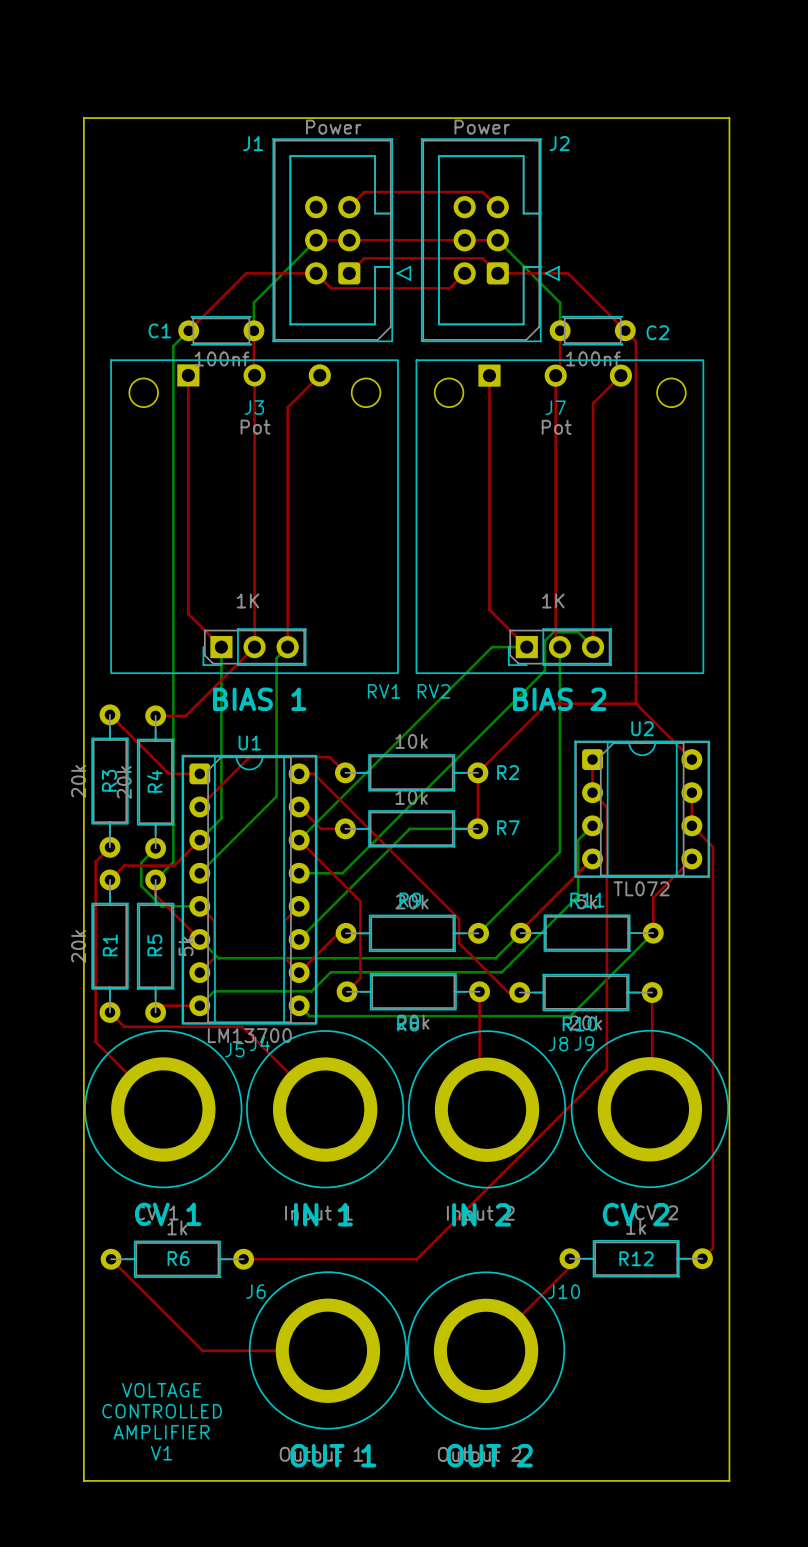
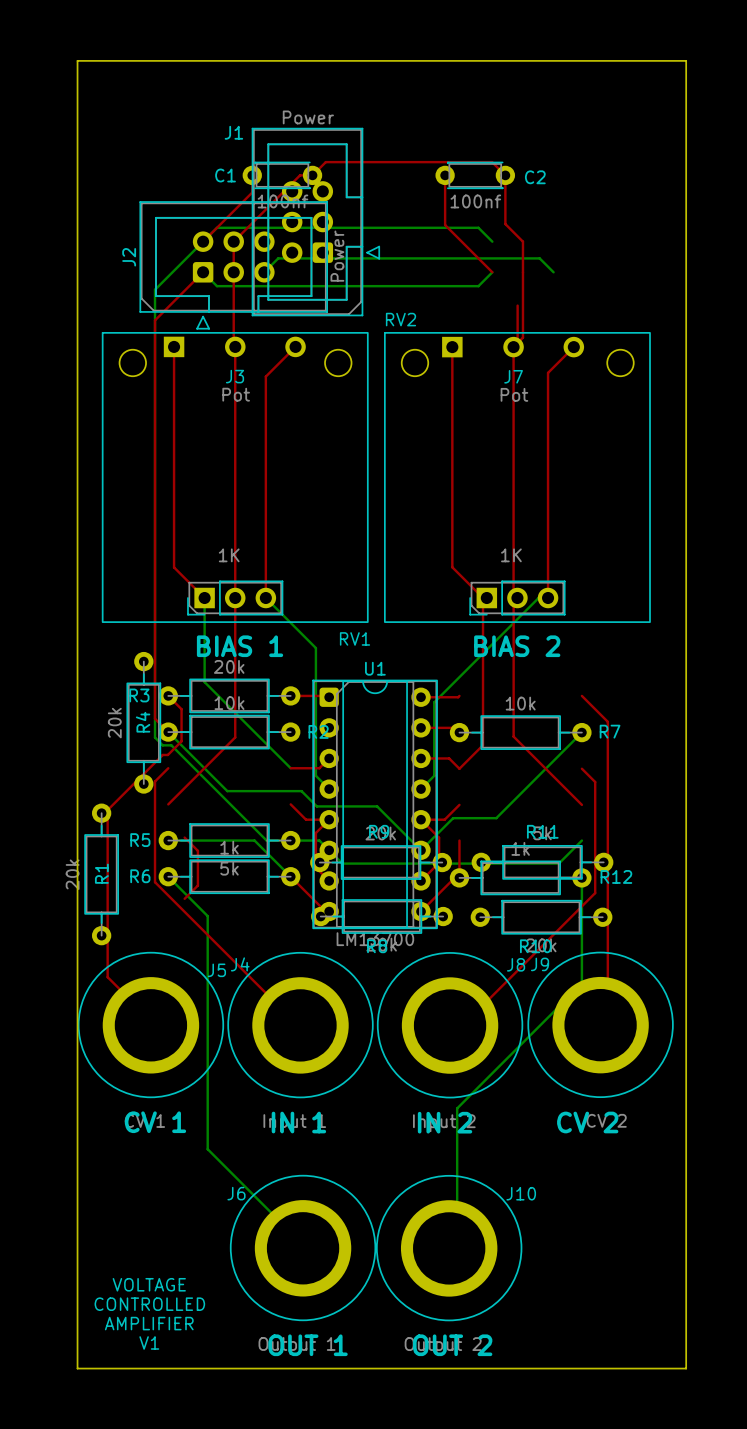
board edge: (83, 118) (729, 118) (729, 1480) -> (77, 109) (77, 60) (686, 60) (686, 1368) (674, 1368)
J2 name position: J2 (559, 143) -> J2 (129, 257)
top track: none -> (252, 175) (252, 192) (203, 241)
top track: none -> (445, 175) (445, 225) (492, 272)
top track: (349, 207) (364, 192) (482, 192) (497, 207) -> none
top track: (316, 240) (497, 240) -> none
bottom track: (316, 240) (253, 302) (253, 330) -> none
J2 rotation: 0° (490, 240) -> 90° clockwise (233, 265)
J2 position: (490, 240) -> (233, 265)
bottom track: (497, 240) (560, 302) (560, 330) -> none
bottom track: none -> (492, 241) (478, 227) (216, 227) (155, 289) (155, 737) (162, 745) (171, 745) (266, 840) (319, 840) (342, 863) (558, 863) (581, 840)
top track: (349, 273) (364, 258) (482, 258) (497, 273) (568, 273) (635, 341) (635, 703) -> none
top track: (464, 273) (449, 288) (331, 288) (316, 273) (246, 273) (188, 330) -> none
top track: none -> (203, 272) (155, 320) (155, 718) (168, 732)
bottom track: none -> (203, 272) (216, 286) (478, 286) (492, 272)
bottom track: none -> (264, 272) (278, 258) (539, 258) (553, 272)
bottom track: (188, 330) (173, 346) (173, 862) (155, 879) -> none
C1 position: (221, 330) -> (282, 175)
top track: (253, 330) (253, 374) -> (517, 343) (522, 337) (522, 241) (505, 224) (505, 175) (492, 162) (325, 162) (312, 175) (300, 175) (233, 241) (234, 346)
C2 position: (592, 330) -> (475, 175)
top track: (254, 384) (254, 647) (185, 715) (155, 715) -> (235, 355) (235, 737) (168, 804)
top track: (489, 609) (526, 647) -> (452, 563) (452, 567) (483, 598) (483, 745) (459, 768) (449, 758) (421, 758)
bottom track: (287, 647) (276, 658) (276, 796) (199, 873) -> (265, 598) (315, 648) (315, 775) (329, 789)
bottom track: (526, 647) (492, 647) (299, 840) -> none
top track: none -> (513, 598) (513, 736) (581, 804)
bottom track: (559, 647) (559, 851) (478, 933) -> none
bottom track: none -> (544, 598) (538, 598) (434, 702) (434, 775) (421, 789)
bottom track: (593, 647) (578, 632) (553, 632) (544, 640) (544, 670) (342, 873) (299, 873) -> none
RV2 name position: RV2 (433, 691) -> RV2 (400, 319)
top track: (635, 703) (691, 759) -> none
top track: (635, 703) (547, 703) (477, 772) (477, 828) -> none
top track: (109, 714) (168, 773) (199, 773) -> none
bottom track: (221, 738) (221, 818) (199, 840) -> (204, 682) (290, 768)
top track: none -> (168, 695) (181, 709) (181, 741) (167, 754) (162, 754) (107, 810) (107, 977) (155, 1025)
top track: none -> (290, 695) (329, 697)
top track: none -> (459, 695) (421, 697)
top track: none -> (581, 695) (607, 721) (607, 1031)
top track: (592, 759) (592, 792) (606, 807) (606, 1069) (416, 1259) (243, 1259) -> none
top track: (345, 772) (329, 757) (249, 757) (199, 806) -> none
R2 position: (411, 772) -> (229, 732)
top track: (299, 773) (313, 773) (459, 918) (459, 943) (508, 992) (519, 992) -> none
R3 name position: R3 (109, 780) -> R3 (139, 695)
R3 rotation: 0° (109, 781) -> 90° clockwise (229, 695)
R3 position: (109, 781) -> (229, 695)
top track: none -> (421, 727) (454, 727)
bottom track: none -> (168, 732) (227, 791) (301, 791) (316, 806) (377, 806) (421, 850) (453, 818) (496, 818) (581, 732)
top track: (691, 792) (691, 825) (712, 846) (712, 1248) (702, 1258) -> none
top track: (299, 806) (321, 828) (345, 828) -> none
U2: TL072 (642, 809) -> none
top track: none -> (329, 758) (319, 768) (290, 768)
bottom track: (592, 825) (578, 840) (578, 896) (501, 972) (330, 972) (311, 991) (214, 991) (199, 1005) -> none
R7 position: (411, 828) -> (520, 732)
bottom track: (477, 828) (409, 828) (299, 939) -> none
top track: none -> (168, 768) (155, 781) (155, 882) (303, 1031) (306, 1031)
top track: none -> (581, 768) (595, 782) (595, 893) (457, 1031)
top track: (199, 840) (174, 865) (124, 865) (109, 879) -> none
top track: (299, 840) (360, 901) (360, 978) (347, 991) -> none
top track: (109, 847) (95, 861) (95, 1041) (163, 1109) -> none
bottom track: (155, 848) (141, 862) (141, 885) (161, 906) (199, 906) -> none
top track: (592, 858) (520, 930) (520, 933) -> none
top track: (691, 858) (653, 897) (653, 933) -> none
top track: none -> (290, 804) (306, 819) (329, 819) (315, 832) (315, 867) (329, 880)
top track: none -> (459, 804) (444, 819) (421, 819) (439, 837) (439, 862) (421, 880)
top track: (155, 879) (155, 895) (199, 939) -> none
U1 position: (249, 889) -> (375, 804)
top track: (299, 906) (284, 920) (284, 958) (299, 972) (338, 933) (346, 933) -> none
bottom track: none -> (168, 840) (254, 840) (290, 876)
top track: none -> (459, 840) (459, 877) (455, 877) (421, 911)
bottom track: (520, 933) (495, 958) (218, 958) (199, 939) -> none
bottom track: (653, 933) (570, 1016) (309, 1016) (299, 1005) -> none
R5 name position: R5 (154, 945) -> R5 (140, 840)
R5 rotation: 0° (155, 946) -> 90° clockwise (229, 840)
R5 position: (155, 946) -> (229, 840)
bottom track: none -> (168, 876) (207, 916) (207, 1149) (306, 1248)
top track: none -> (290, 876) (325, 911) (329, 911)
bottom track: none -> (581, 877) (581, 983) (457, 1108) (457, 1248)
top track: (479, 991) (479, 1102) (487, 1109) -> none
top track: (652, 992) (652, 1106) (649, 1109) -> none
top track: (199, 1005) (162, 1005) (155, 1012) -> none
top track: (109, 1012) (124, 1026) (242, 1026) (325, 1109) -> none
R6 name position: R6 (178, 1258) -> R6 (140, 876)
top track: (569, 1258) (569, 1267) (486, 1350) -> none
R12 position: (636, 1258) -> (520, 877)
R12 name position: R12 (636, 1258) -> R12 (616, 876)
top track: (111, 1259) (202, 1350) (327, 1350) -> none
R6 position: (177, 1259) -> (229, 876)

